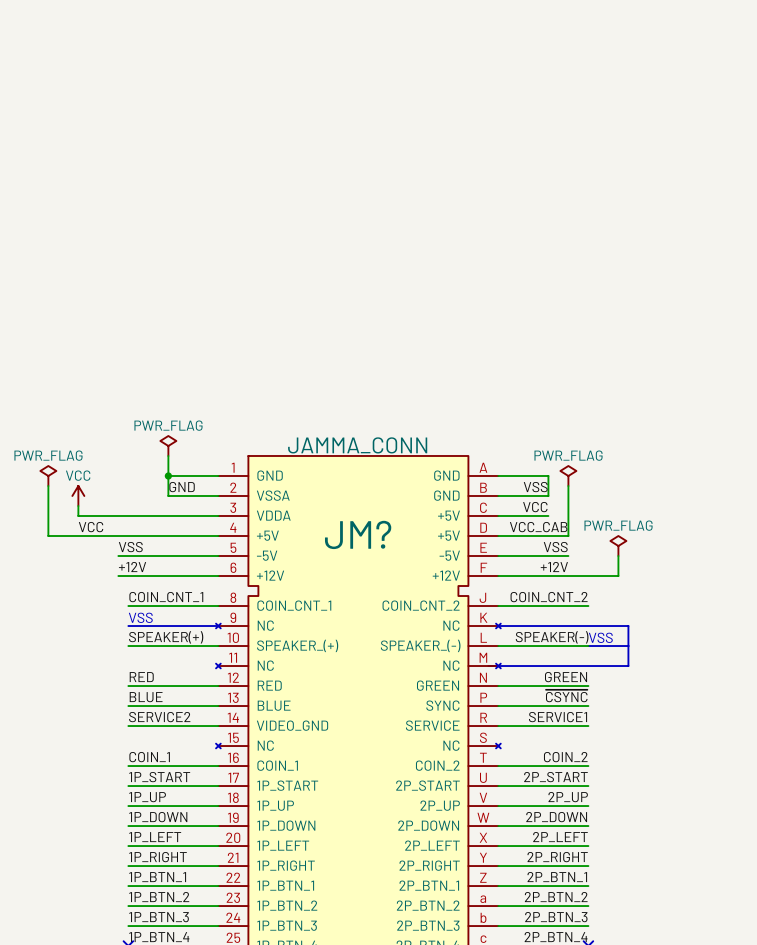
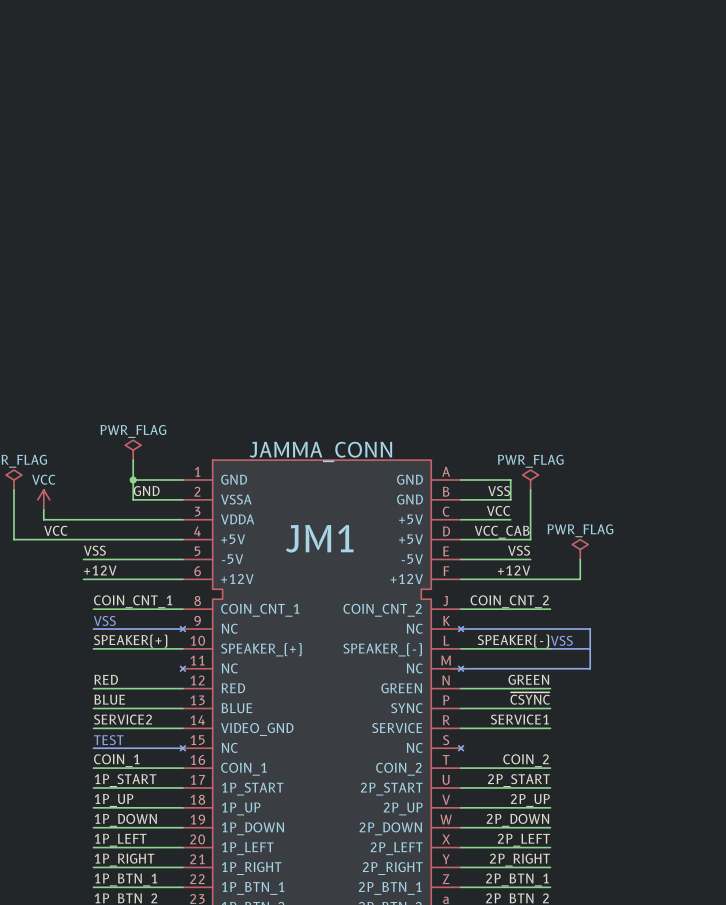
JM? name: JM? (358, 534) -> JM1 (319, 538)
text: none -> TEST (108, 740)
line: none -> (93, 748) (182, 748)

